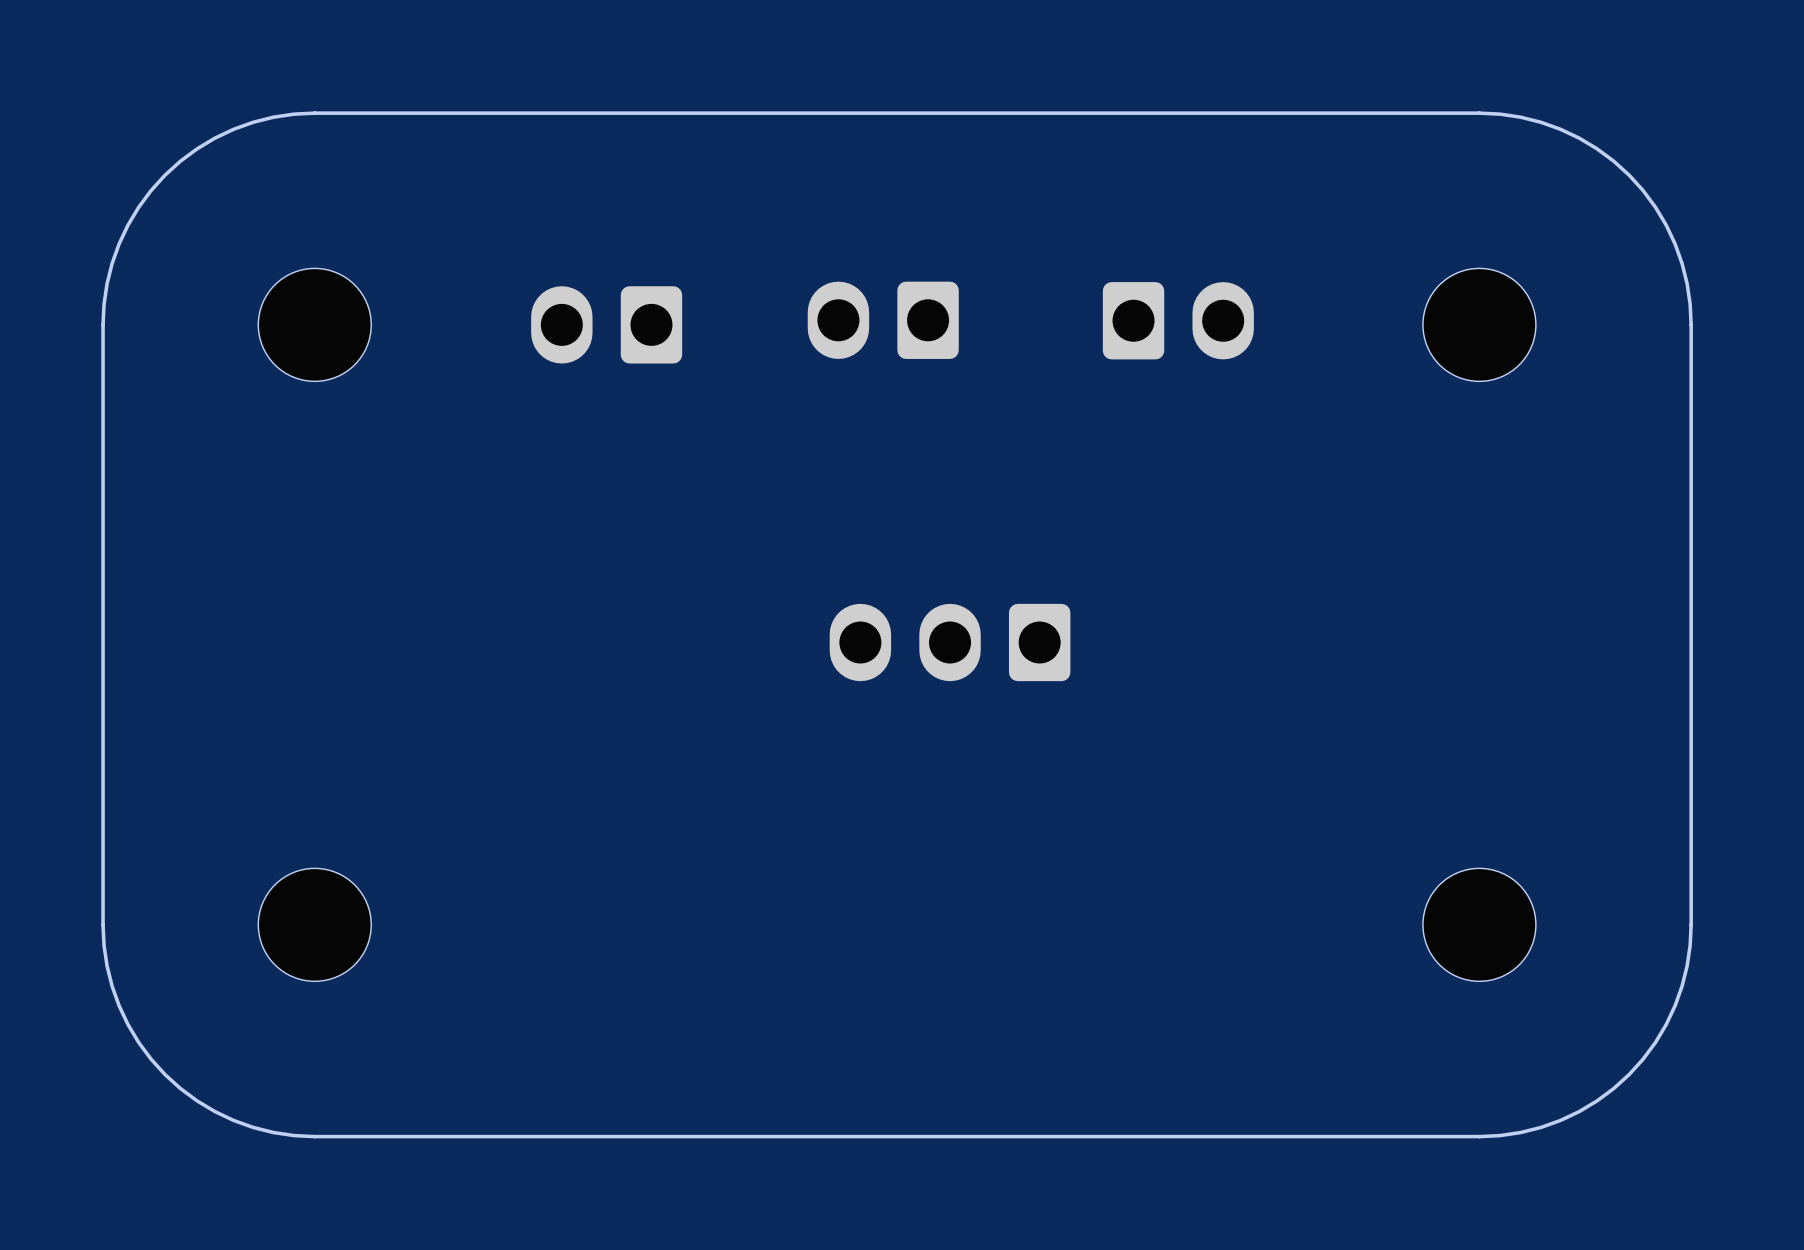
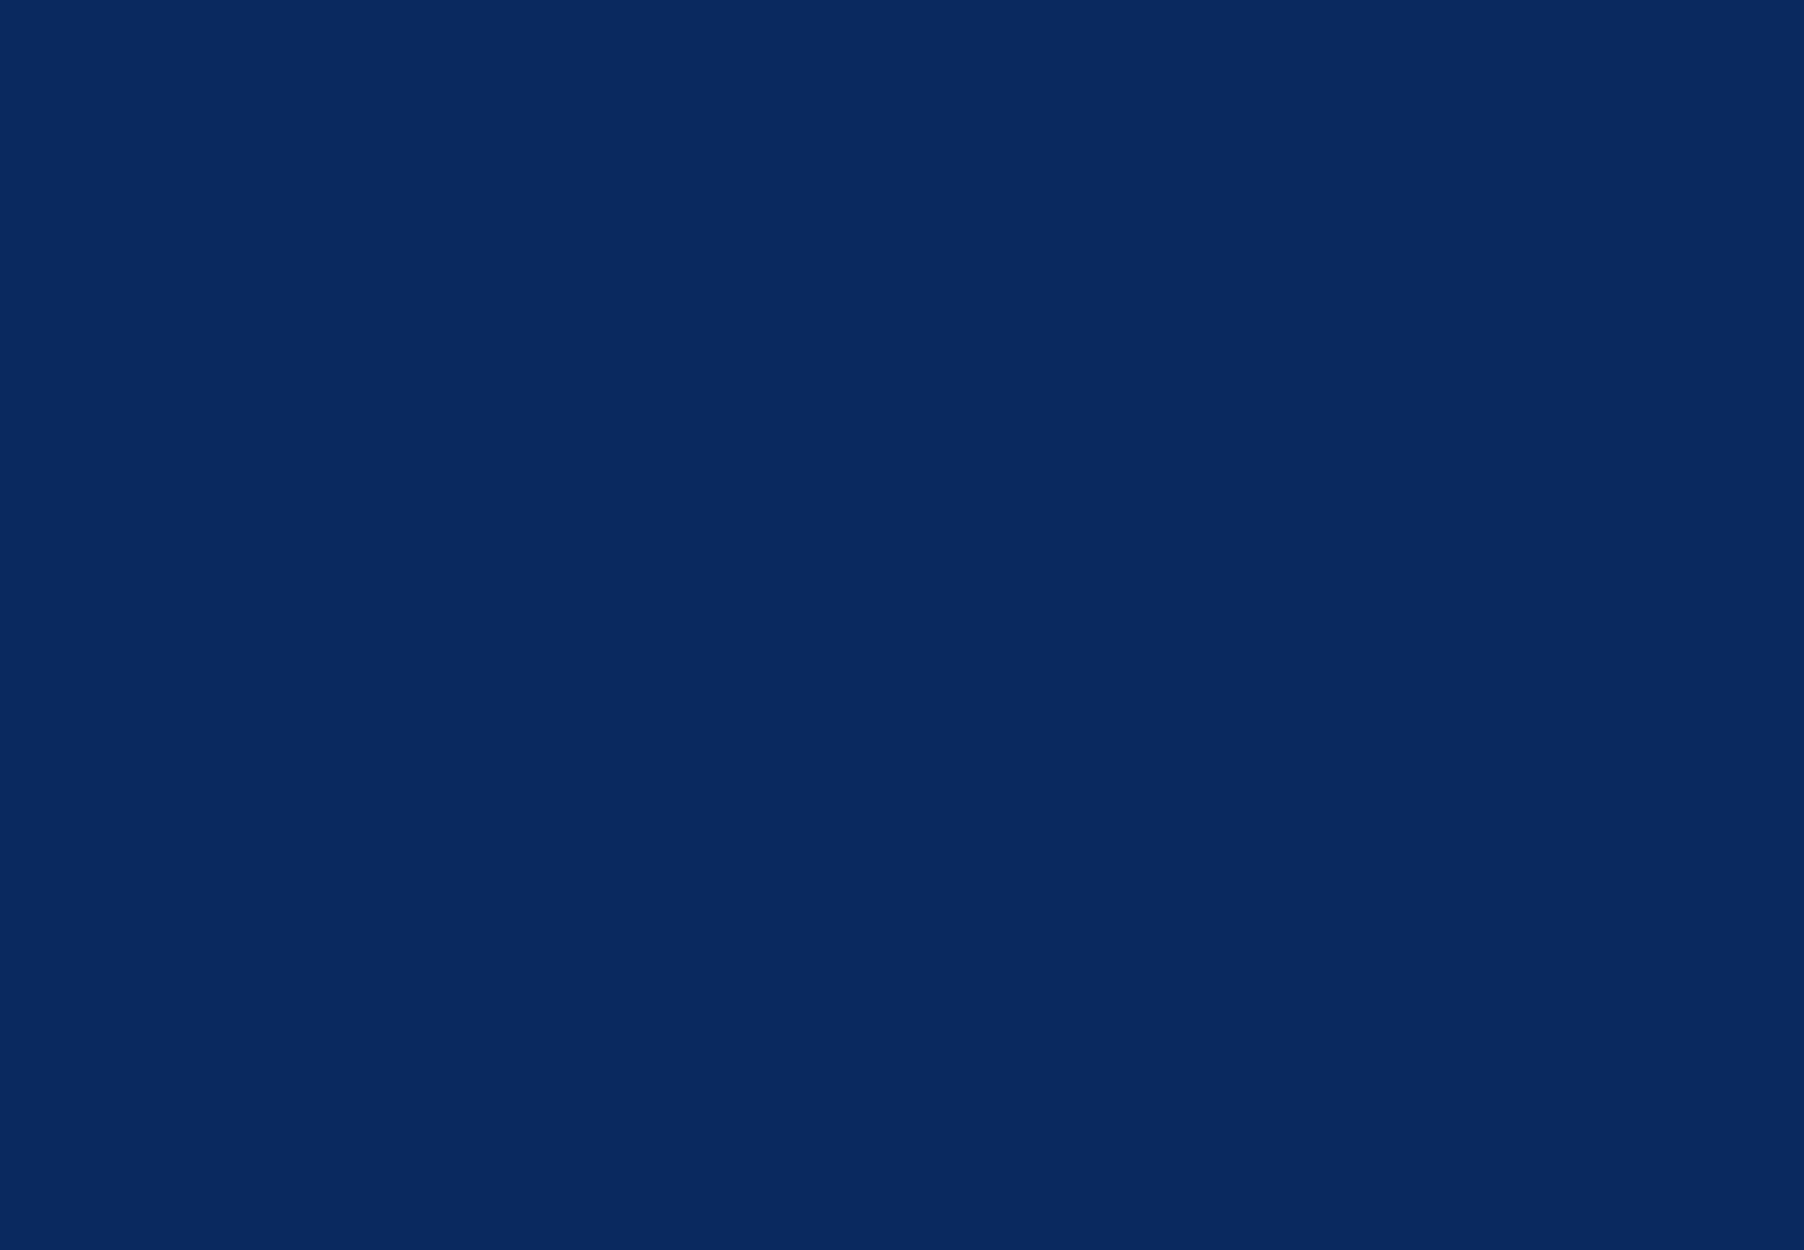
board edge: (1479, 113) (314, 113) (294, 114) (253, 122) (214, 138) (197, 148) (165, 175) (138, 207) (119, 243) (107, 283) (104, 304) (103, 924) (107, 966) (112, 986) (128, 1024) (138, 1042) (165, 1074) (180, 1088) (214, 1111) (233, 1120) (273, 1132) (314, 1136) (1479, 1136) (1520, 1132) (1540, 1127) (1560, 1120) (1597, 1100) (1613, 1088) (1643, 1059) (1666, 1024) (1682, 986) (1690, 945) (1690, 304) (1682, 263) (1666, 225) (1643, 190) (1613, 161) (1579, 138) (1540, 122) (1500, 114) (1479, 113) -> none
part: (883, 320) -> none
part: (1178, 320) -> none
part: (314, 324) -> none
part: (606, 324) -> none
part: (1479, 324) -> none
part: (950, 642) -> none
part: (314, 924) -> none
part: (1479, 924) -> none

